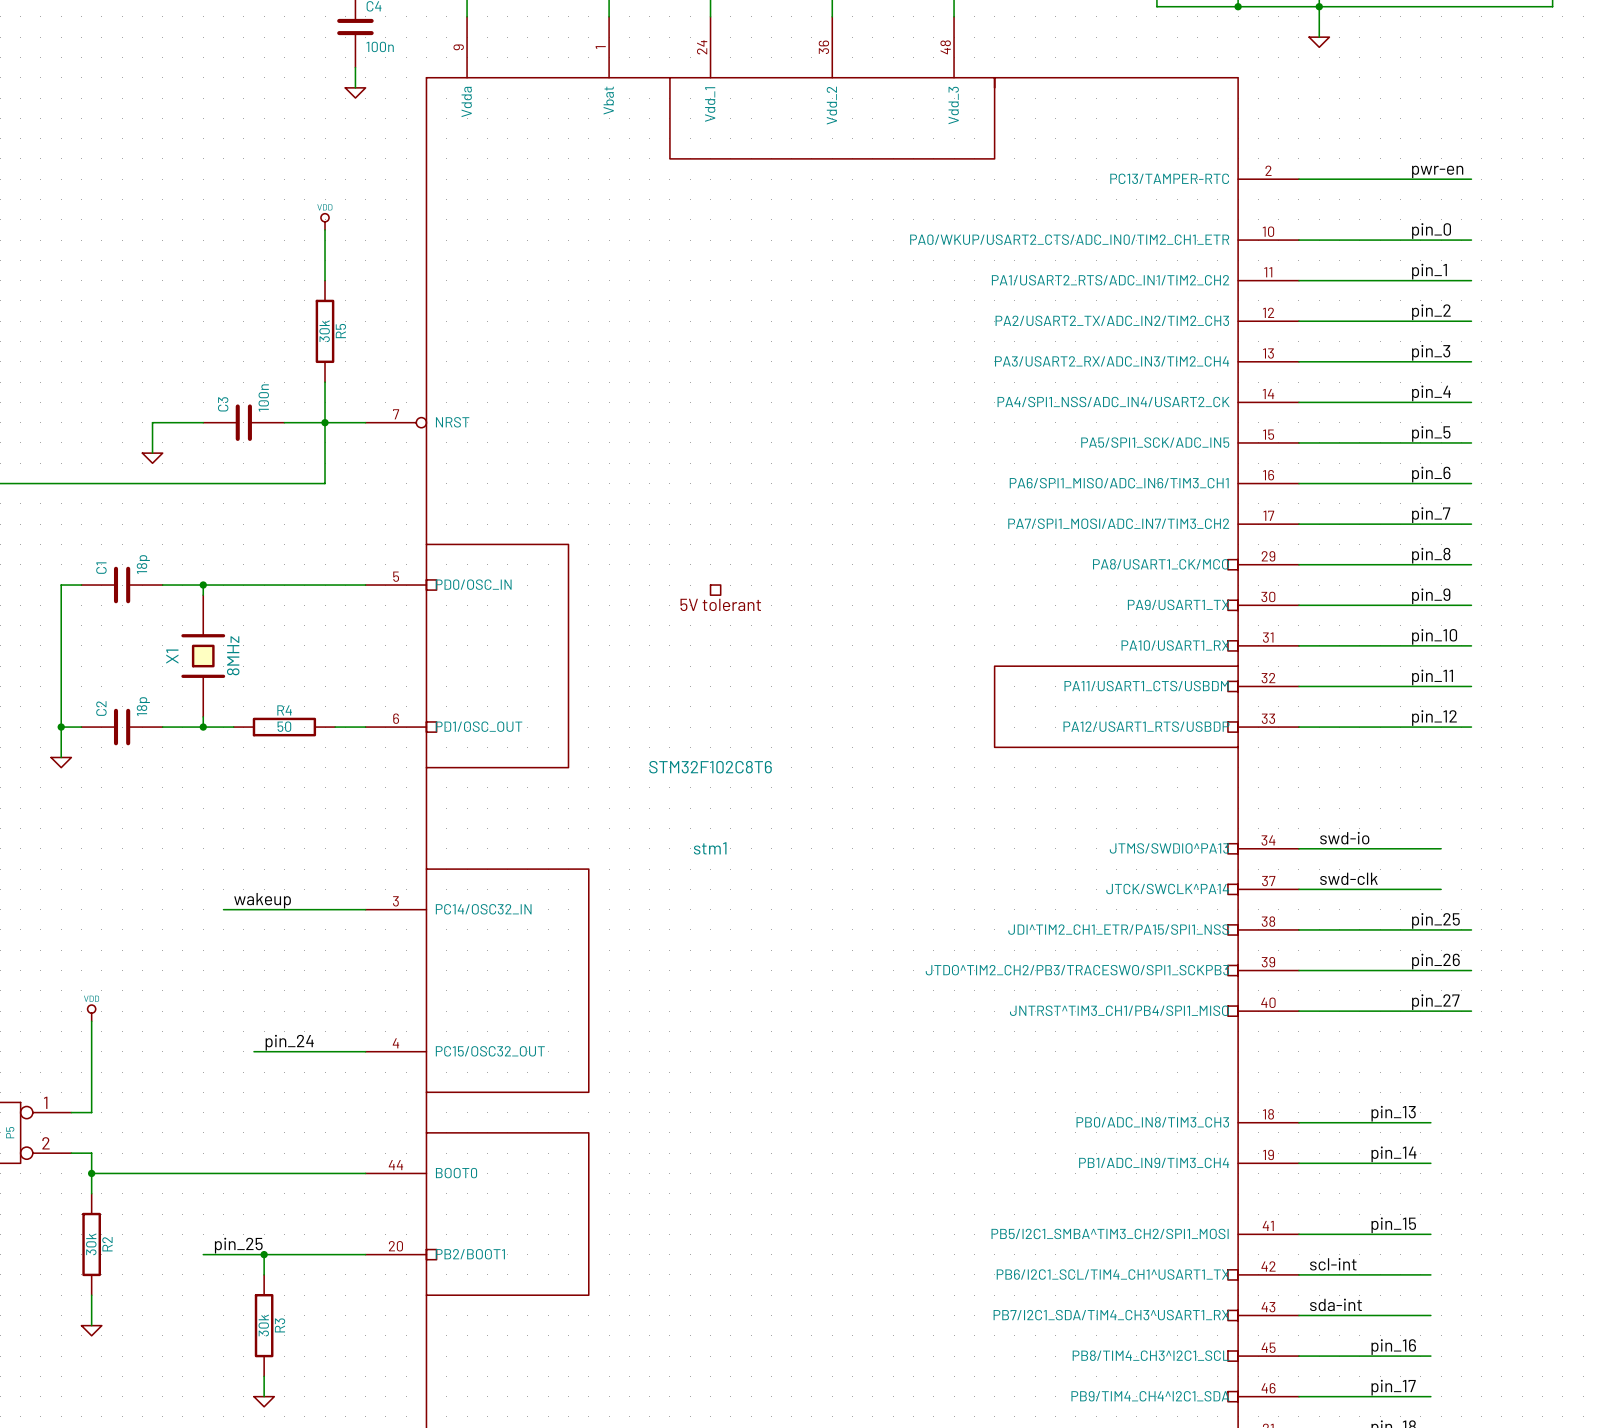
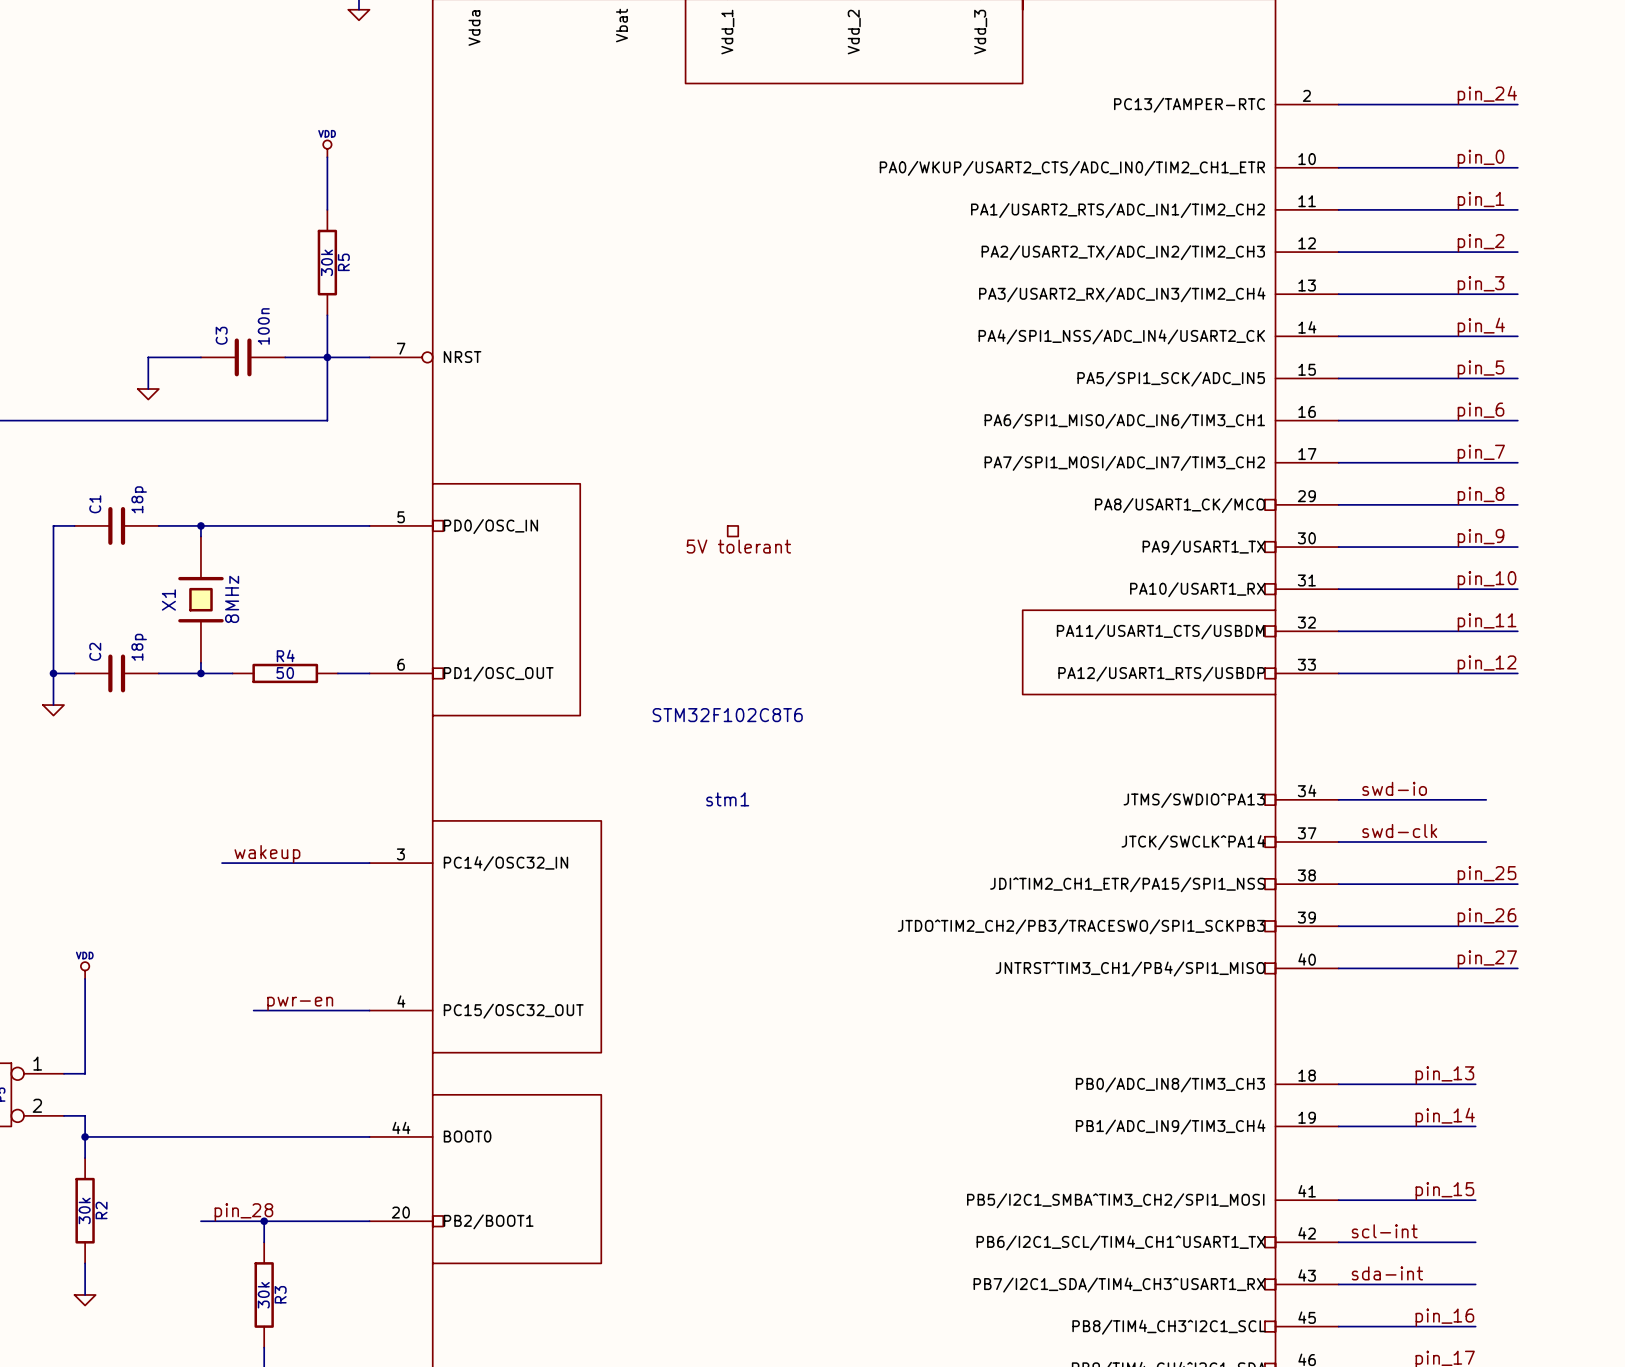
label: pwr-en (1437, 171) -> pin_24 (1487, 95)
label: pin_24 (289, 1042) -> pwr-en (300, 1003)
label: pin_25 (238, 1245) -> pin_28 (243, 1212)

